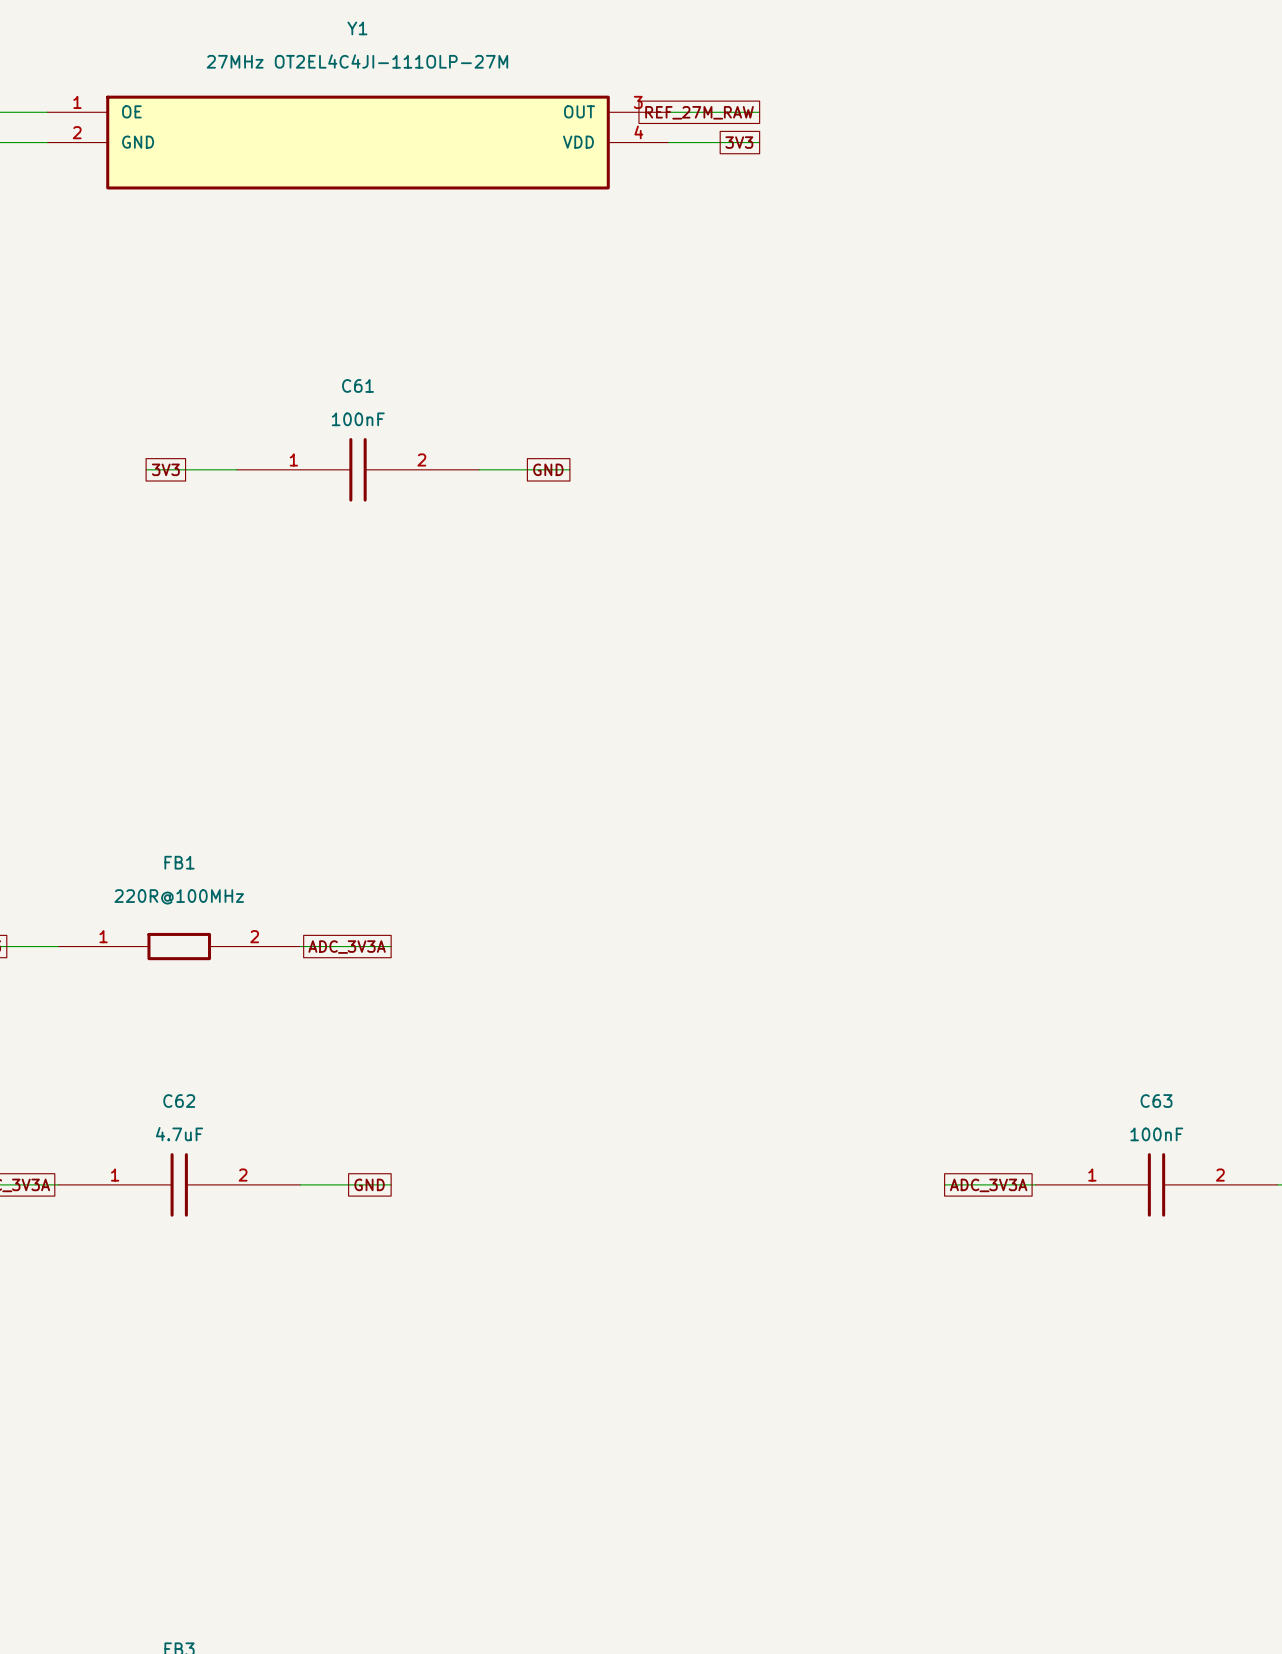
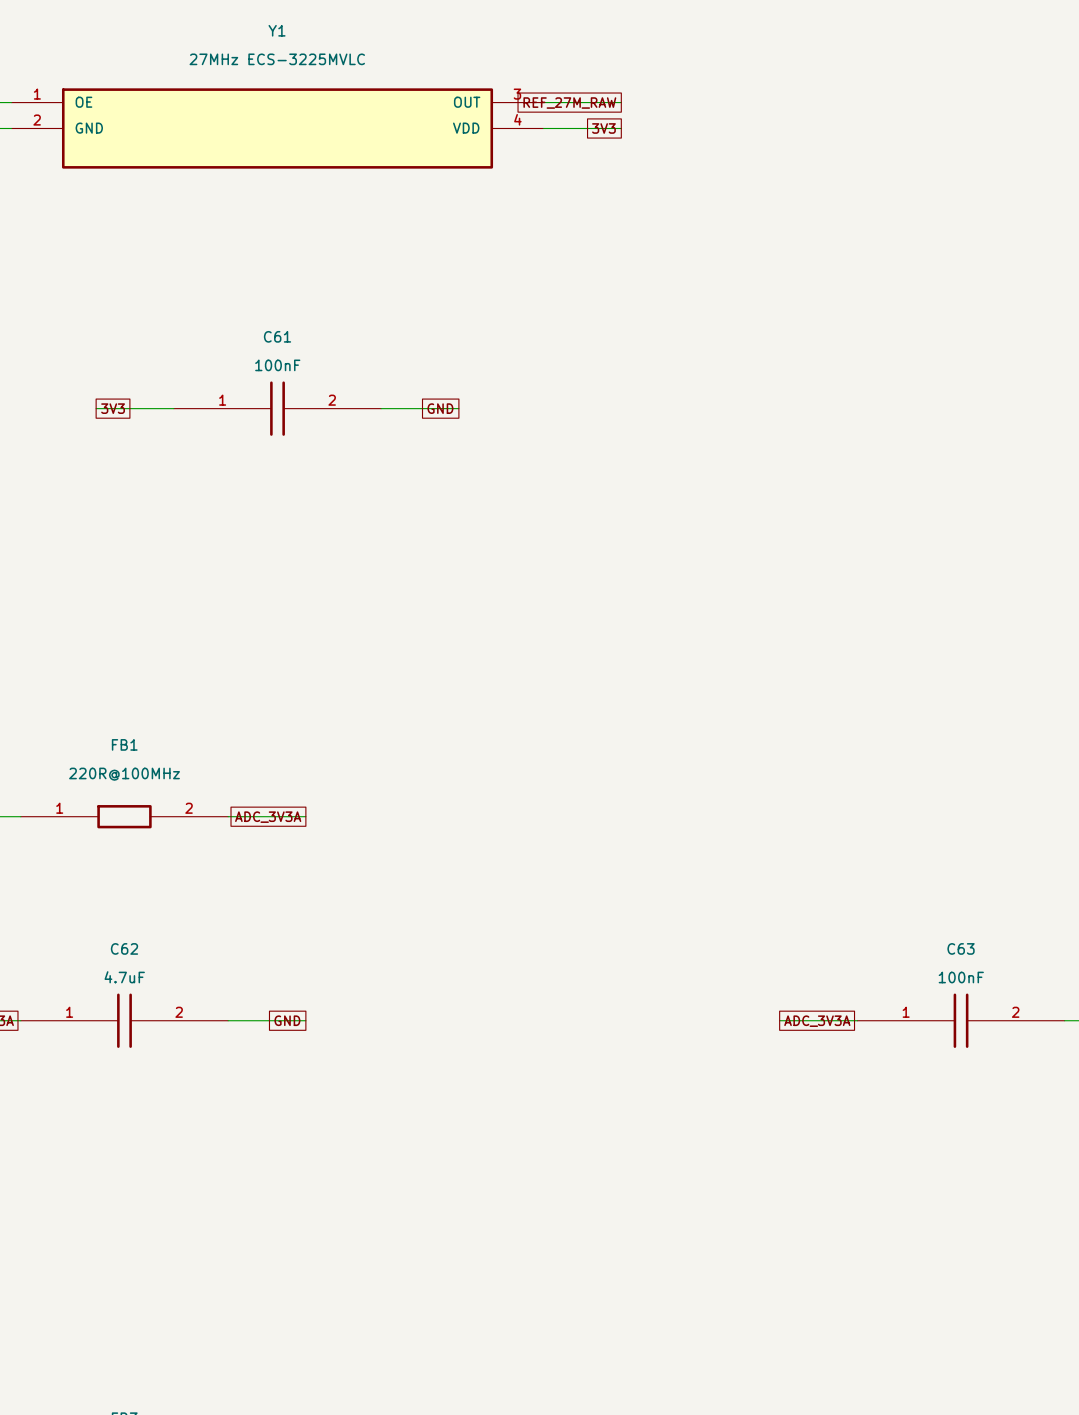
Y1 value: 27MHz OT2EL4C4JI-111OLP-27M (357, 61) -> 27MHz ECS-3225MVLC (277, 59)

